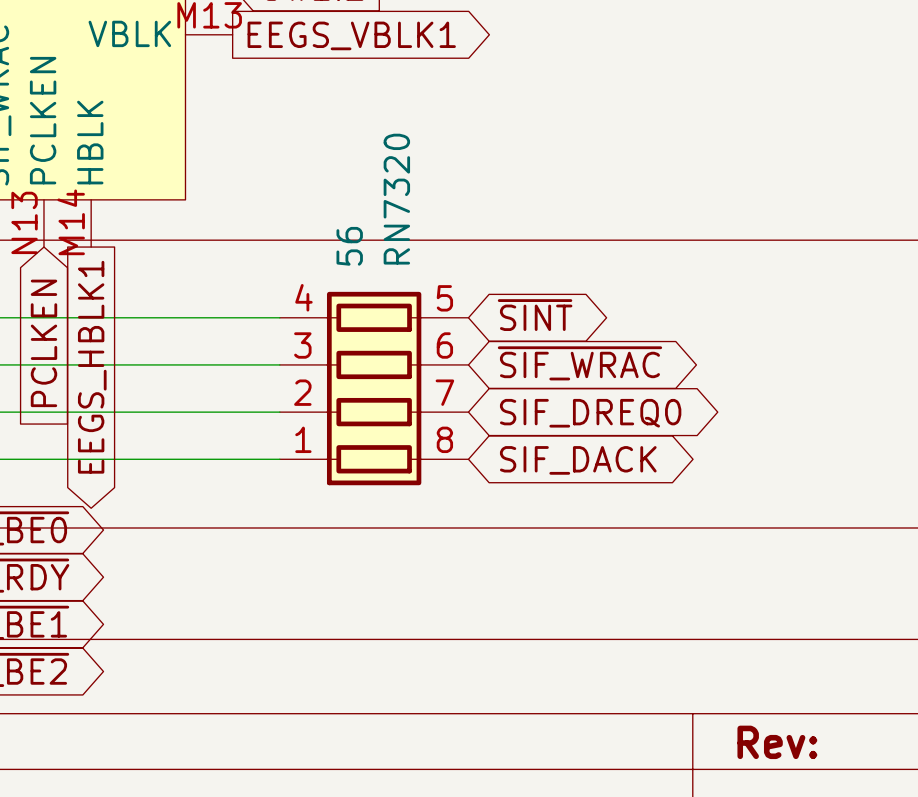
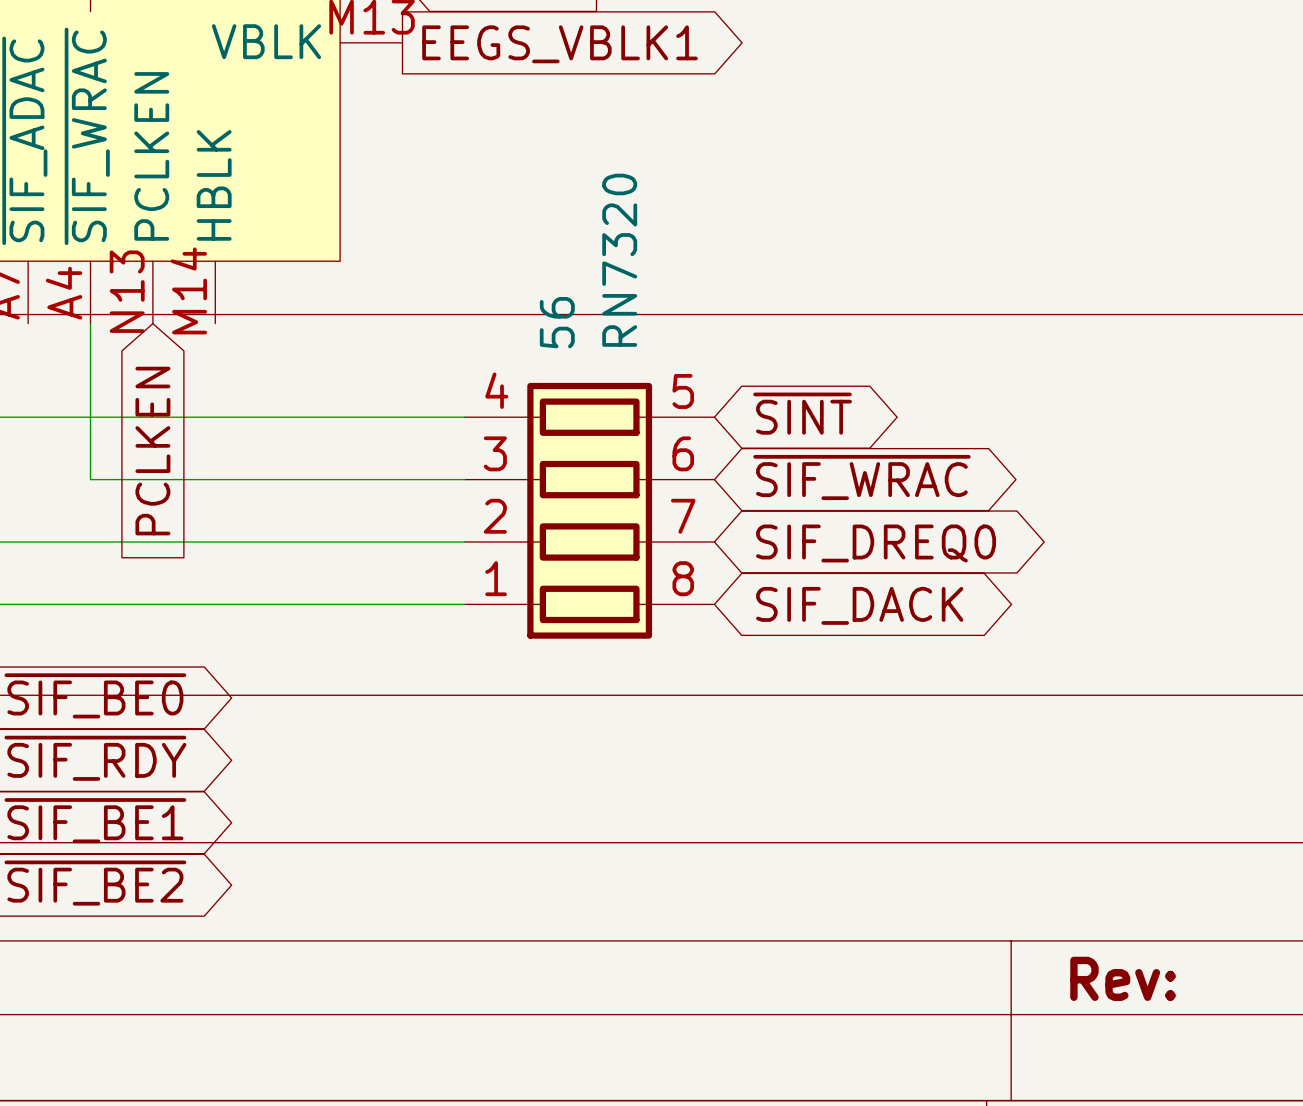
global label: EEGS_HBLK1 (92, 367) -> none

